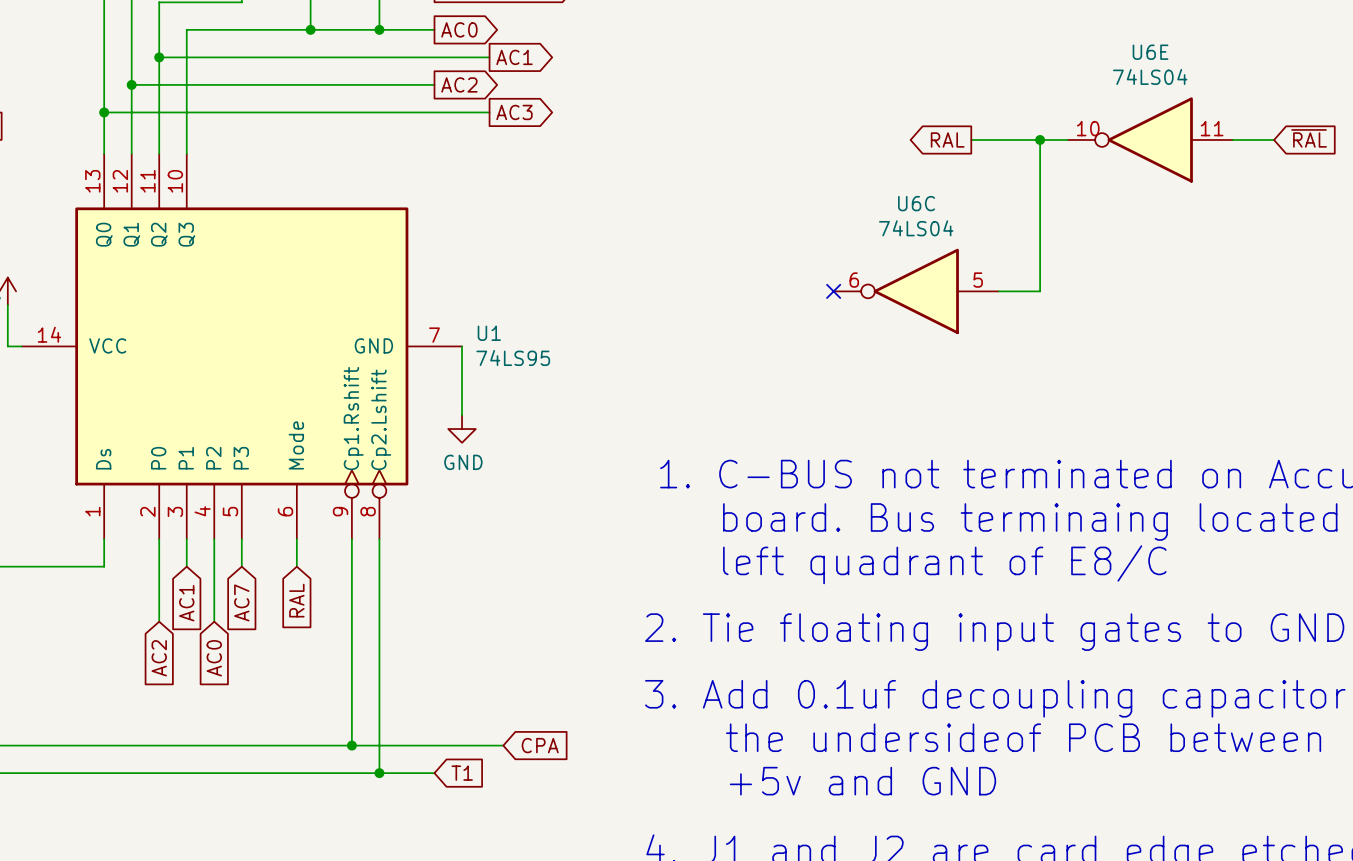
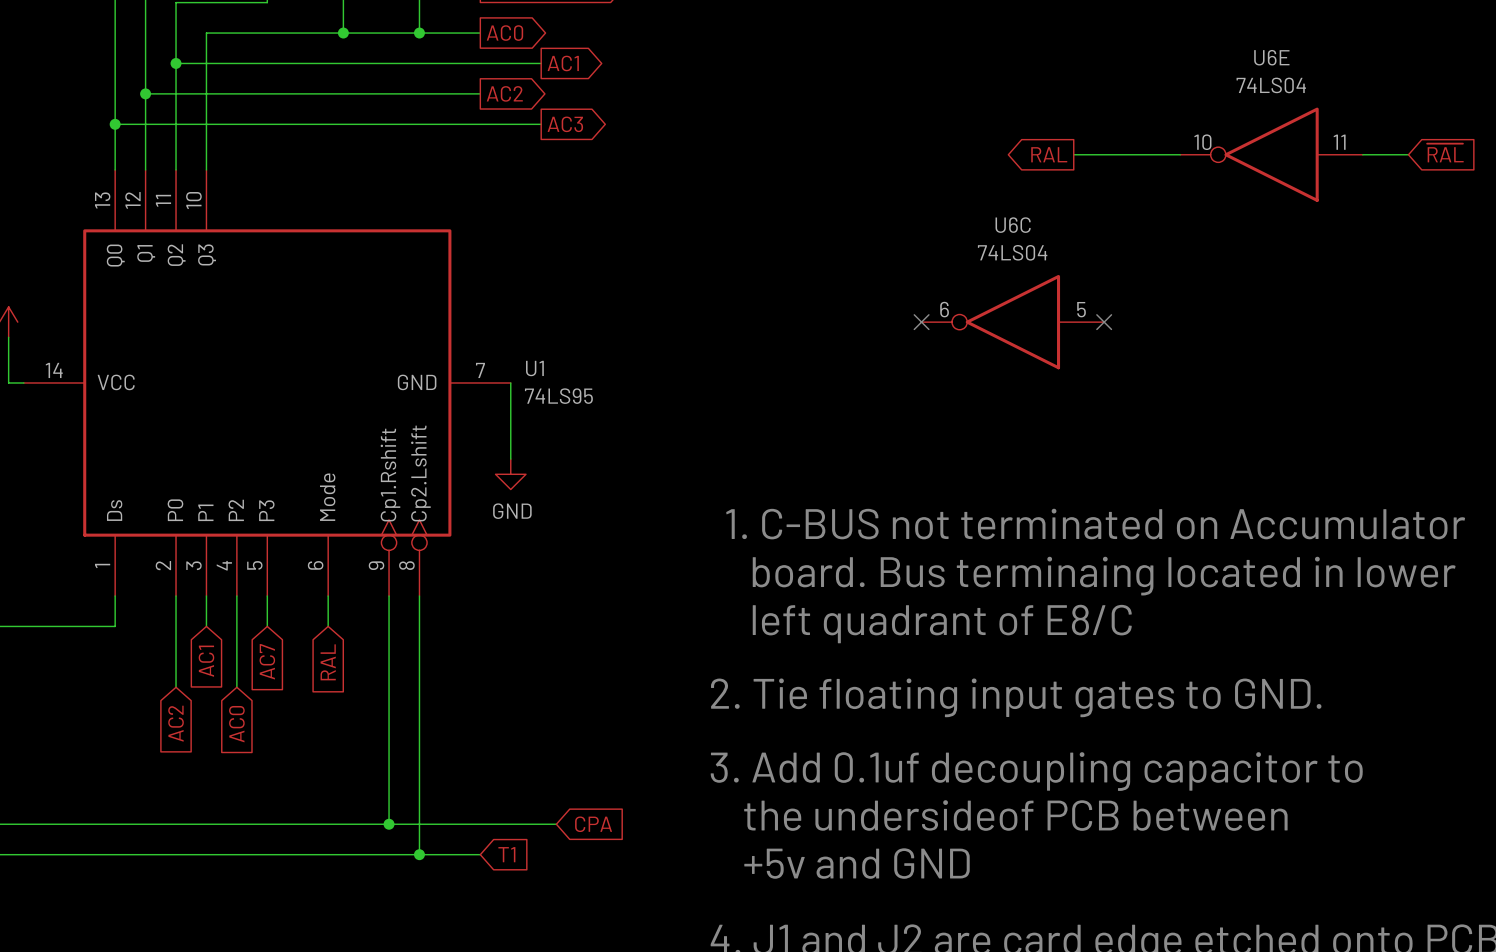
wire: (1040, 139) (1040, 291) (998, 291) -> none
junction: (1040, 139) -> none
no-connect mark: none -> (1104, 322)

